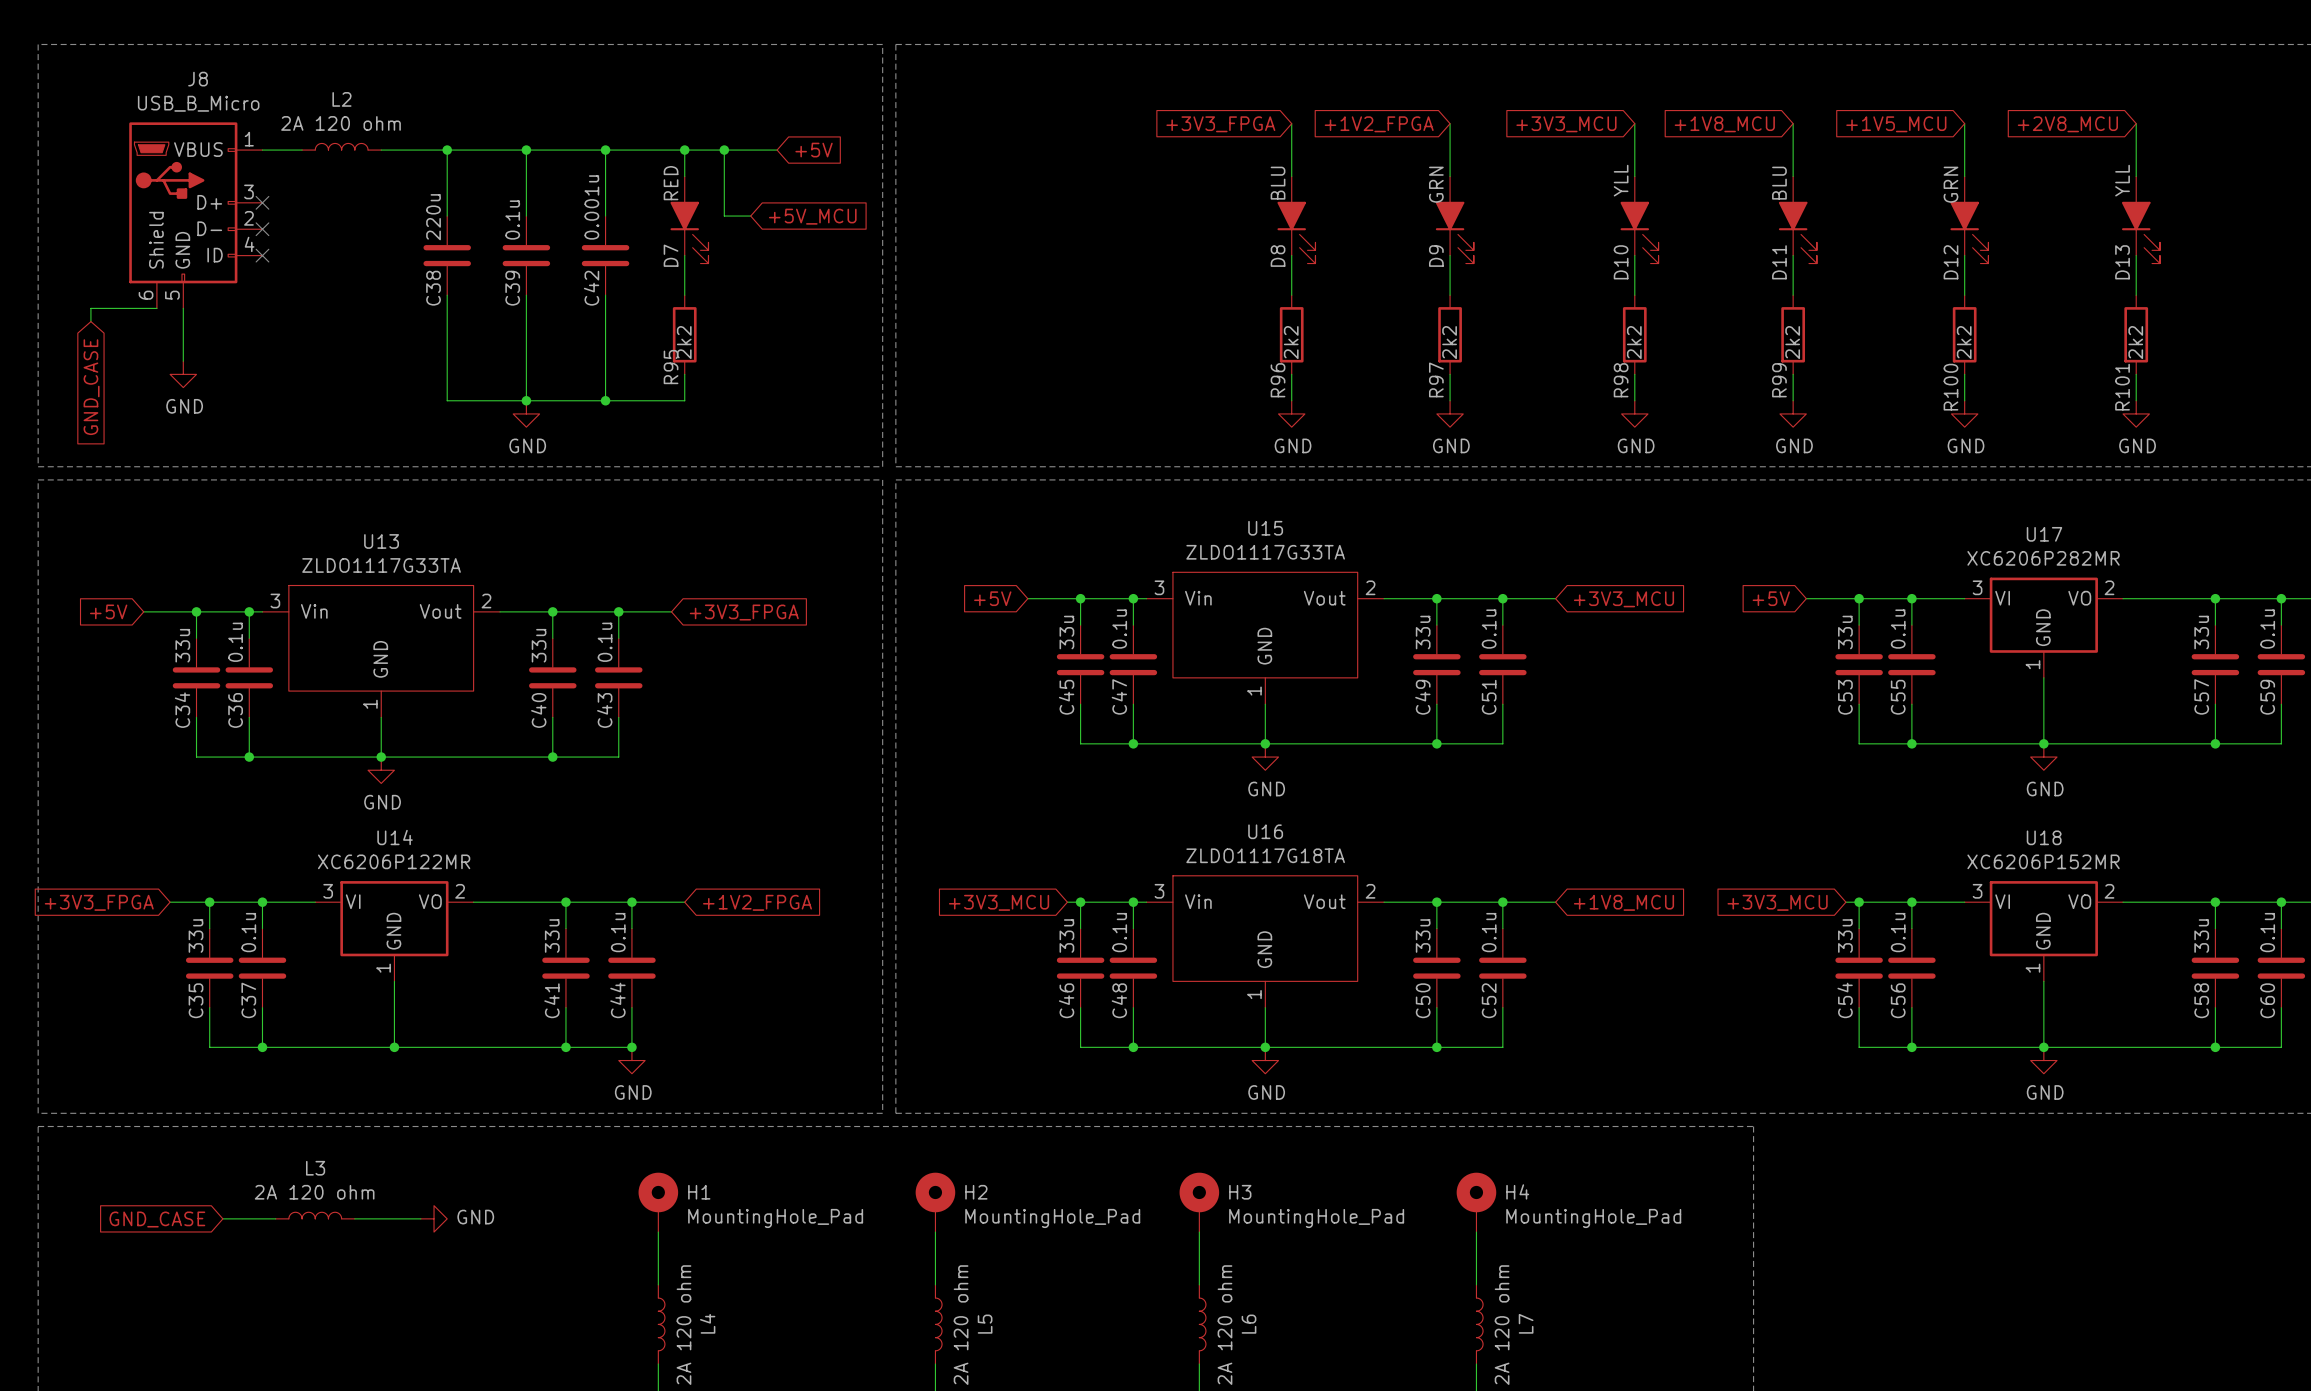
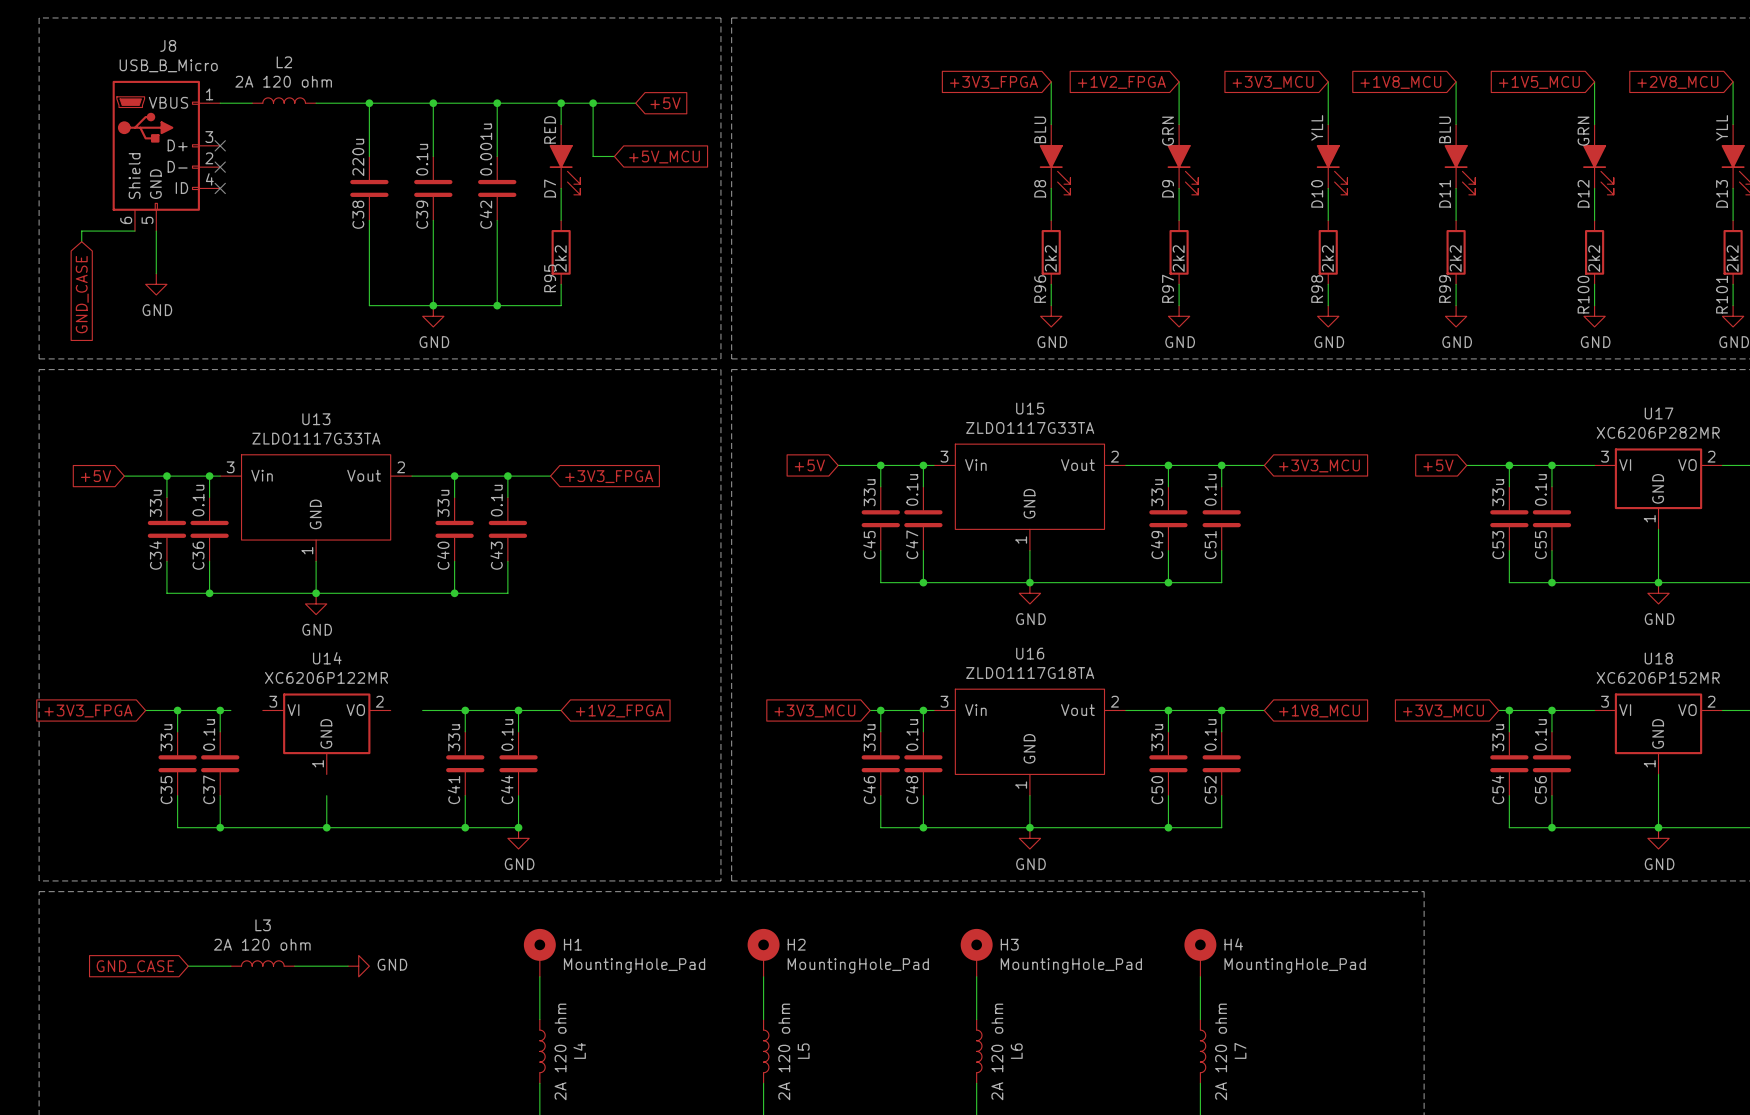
wire: (275, 902) (315, 902) -> none
wire: (473, 902) (513, 902) -> none
wire: (394, 981) (394, 1007) -> none

